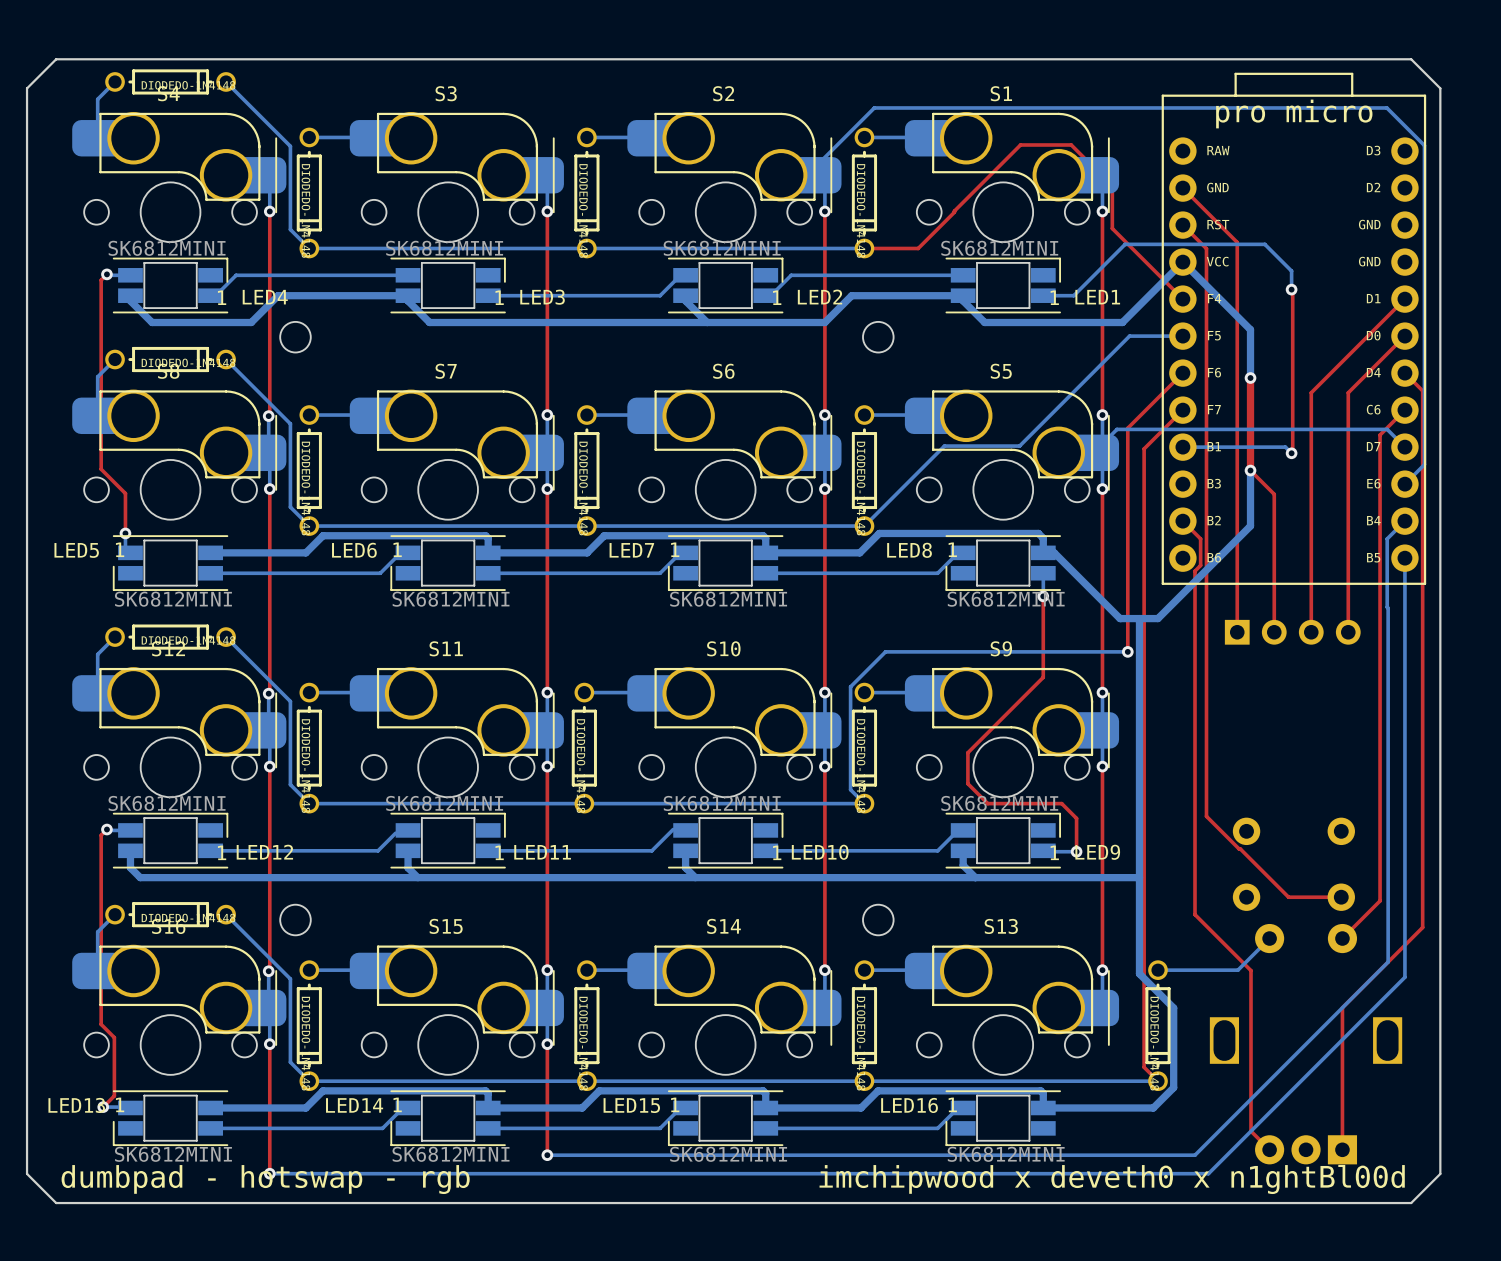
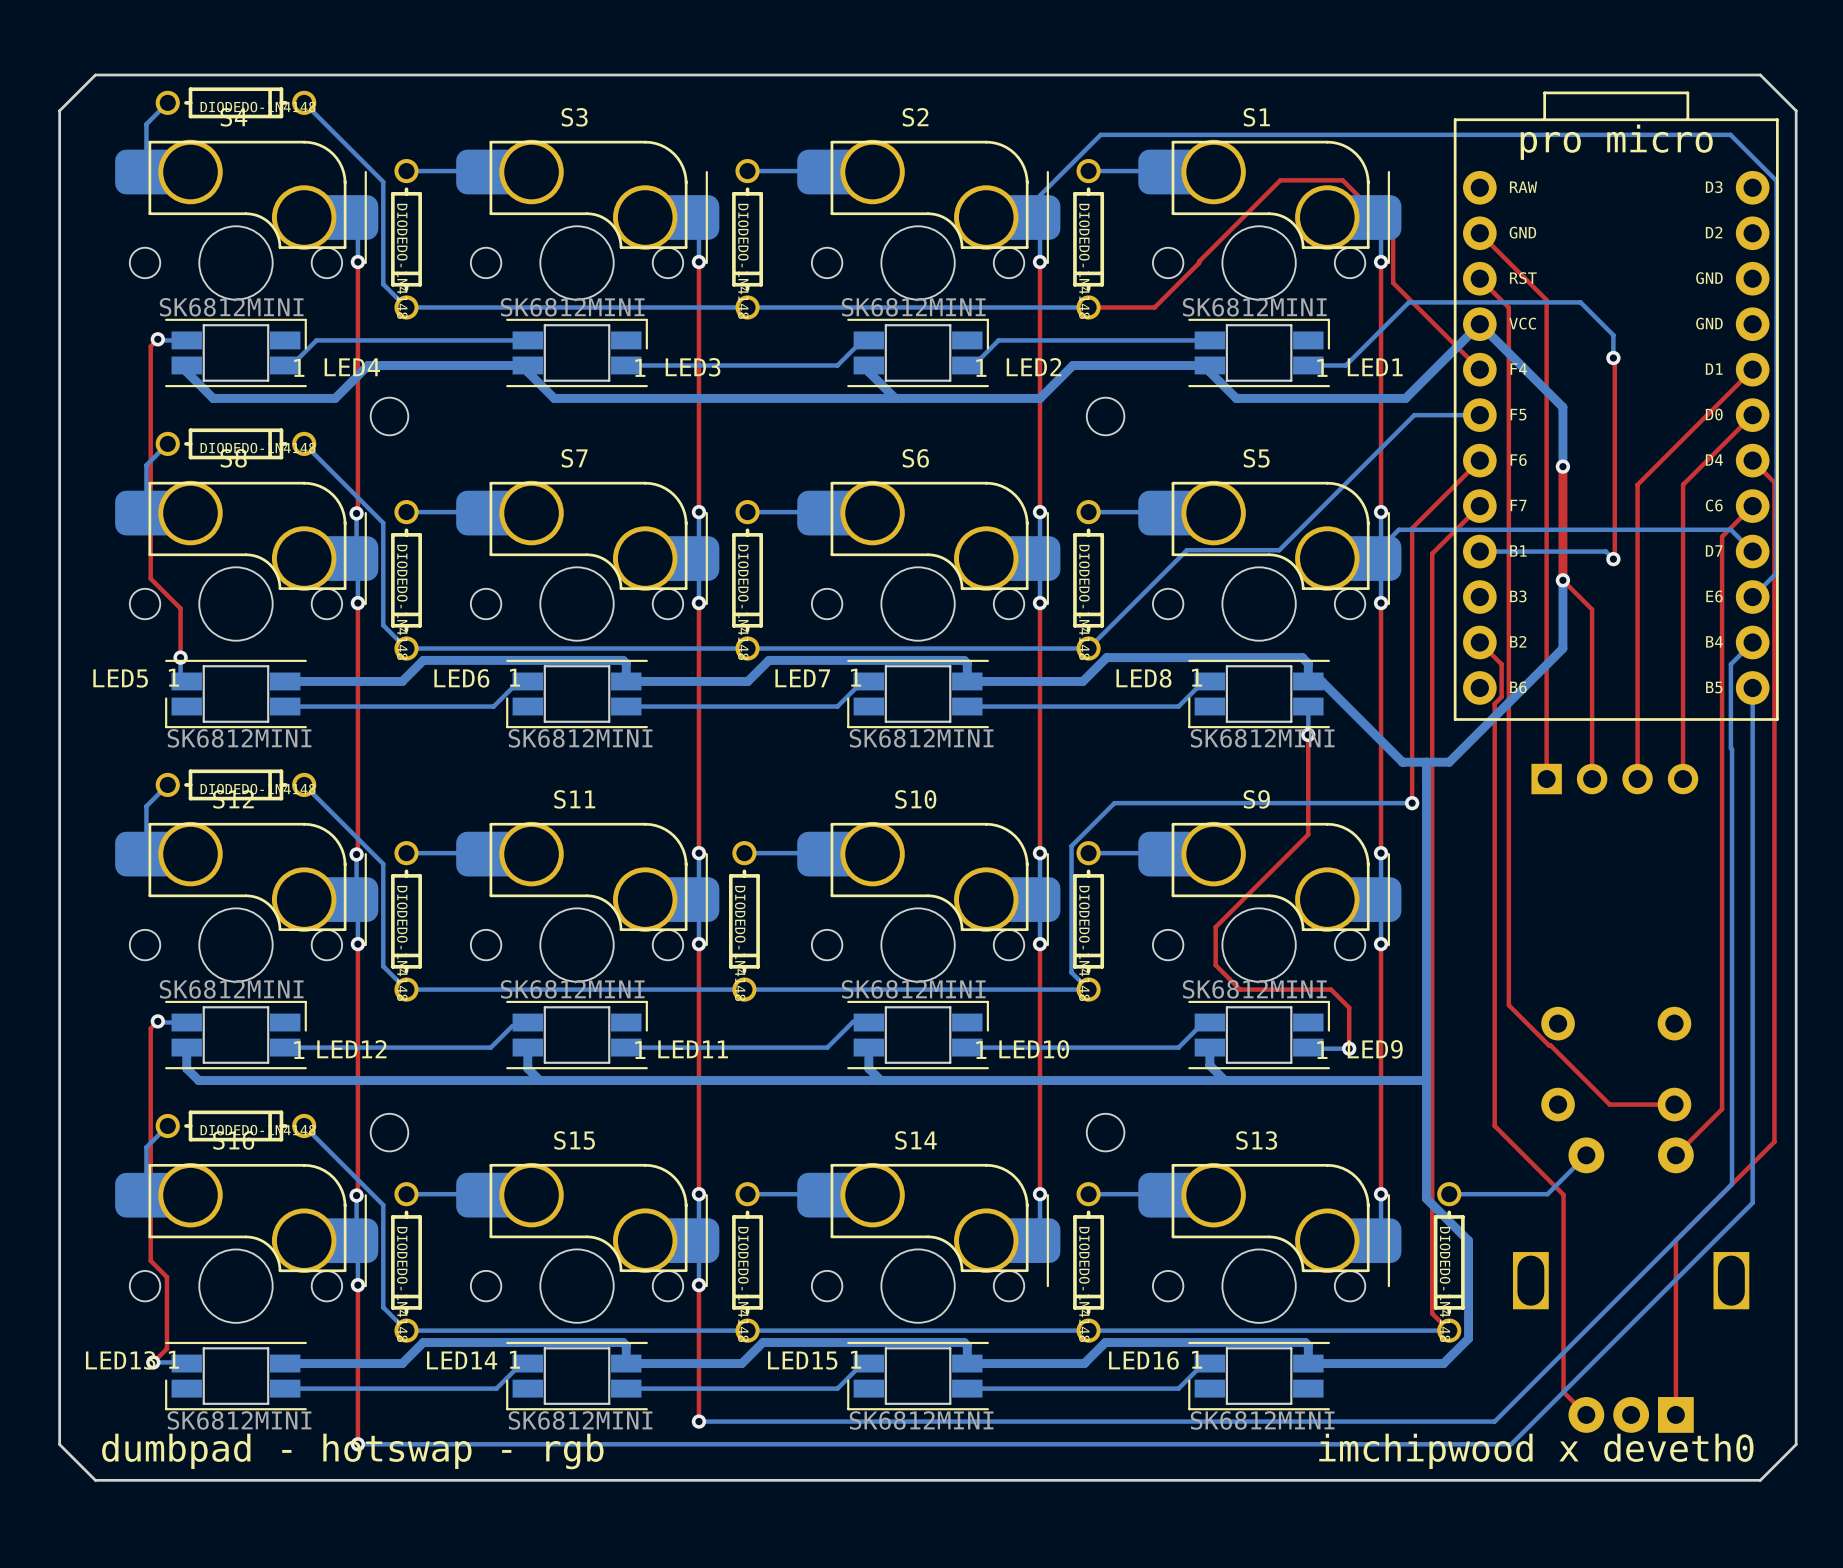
text: imchipwood x deveth0 x n1ghtBl00d (1112, 1179) -> imchipwood x deveth0 (1536, 1451)

